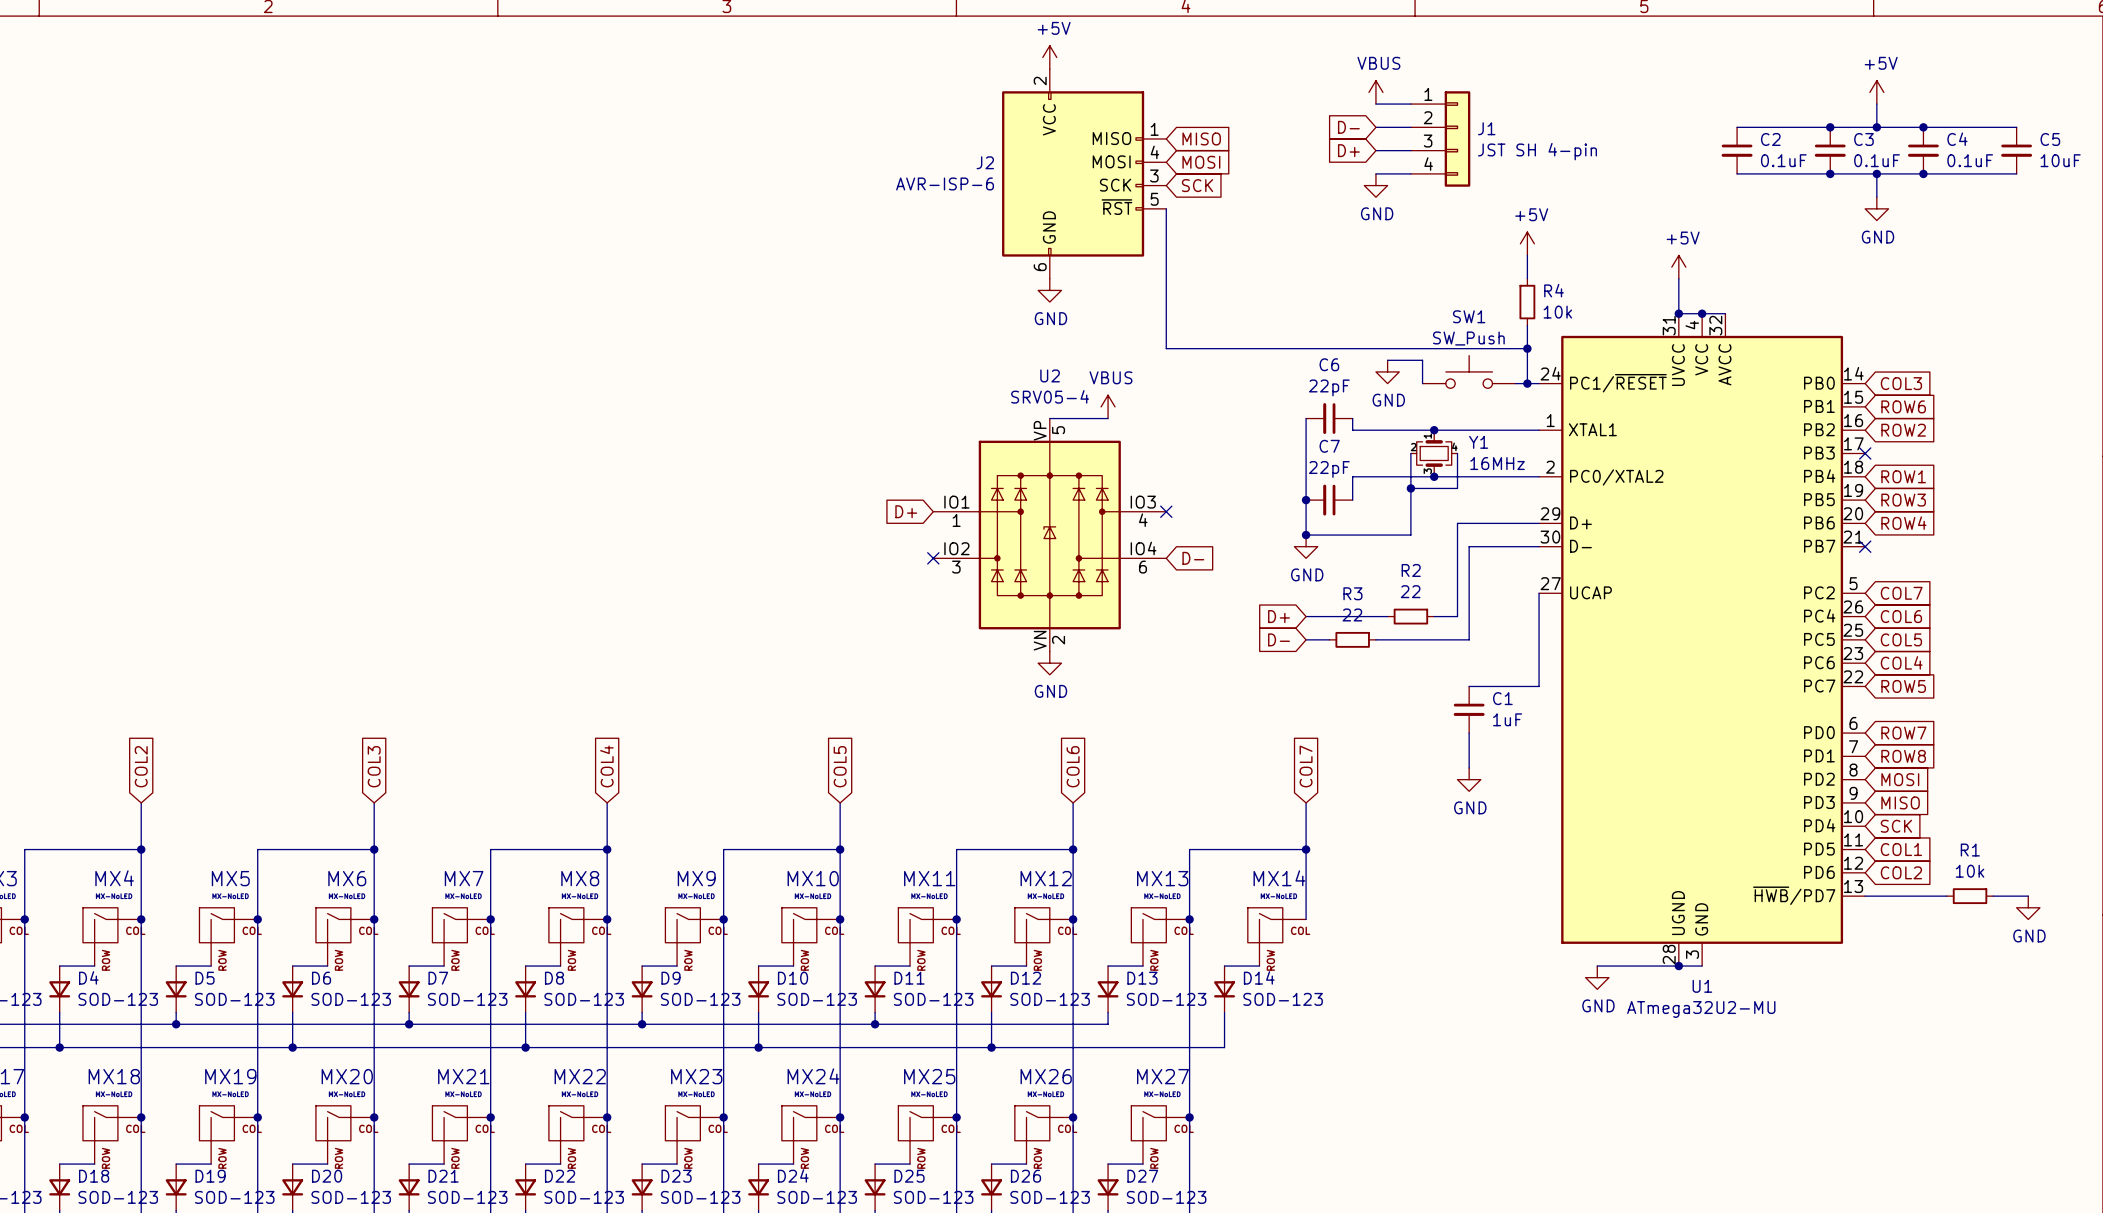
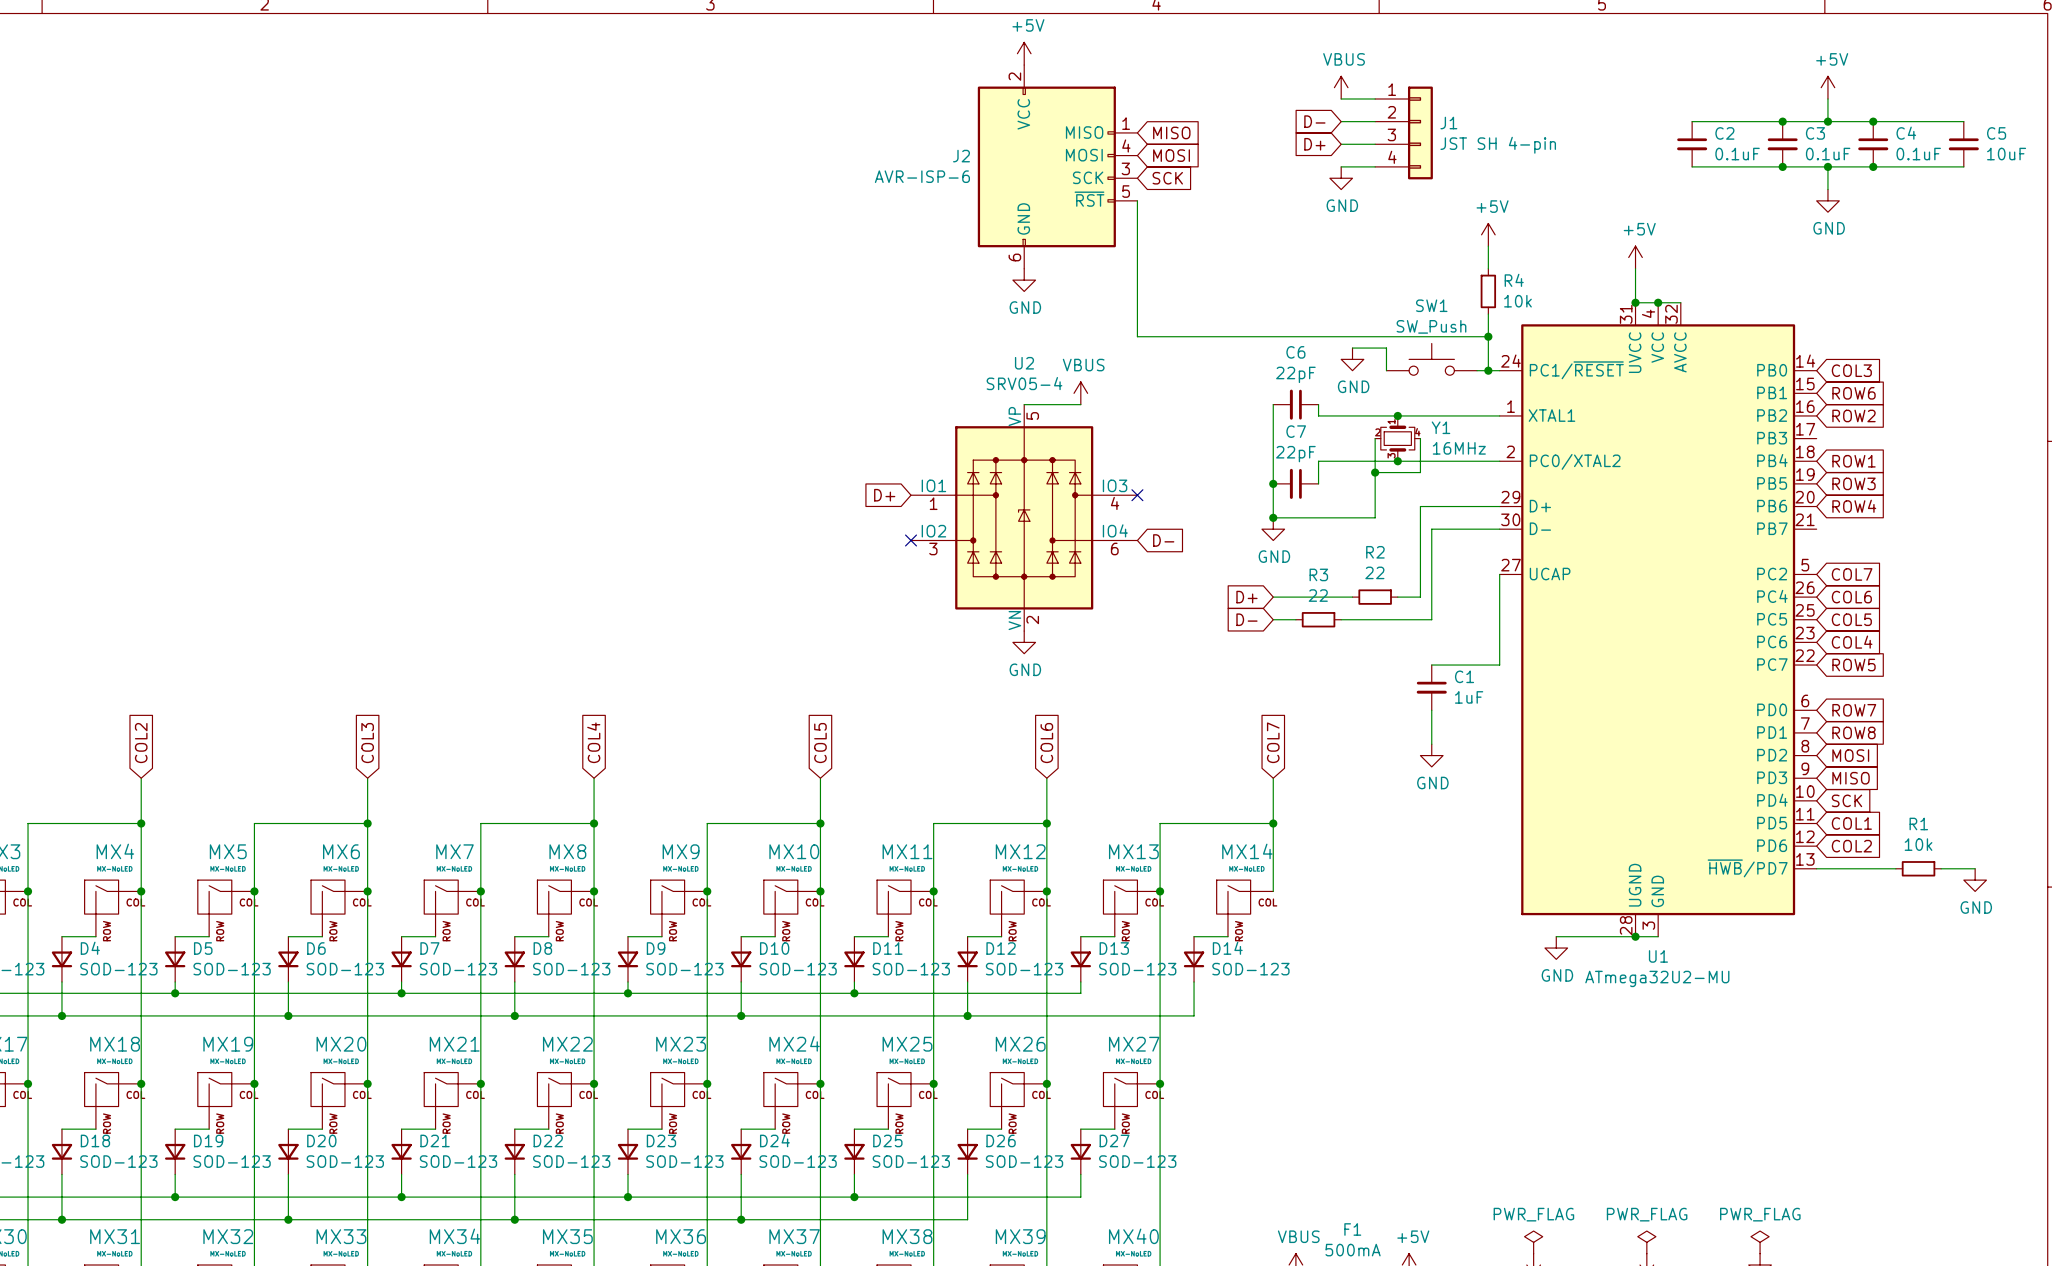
no-connect mark: (1865, 453) -> none
no-connect mark: (1865, 546) -> none

